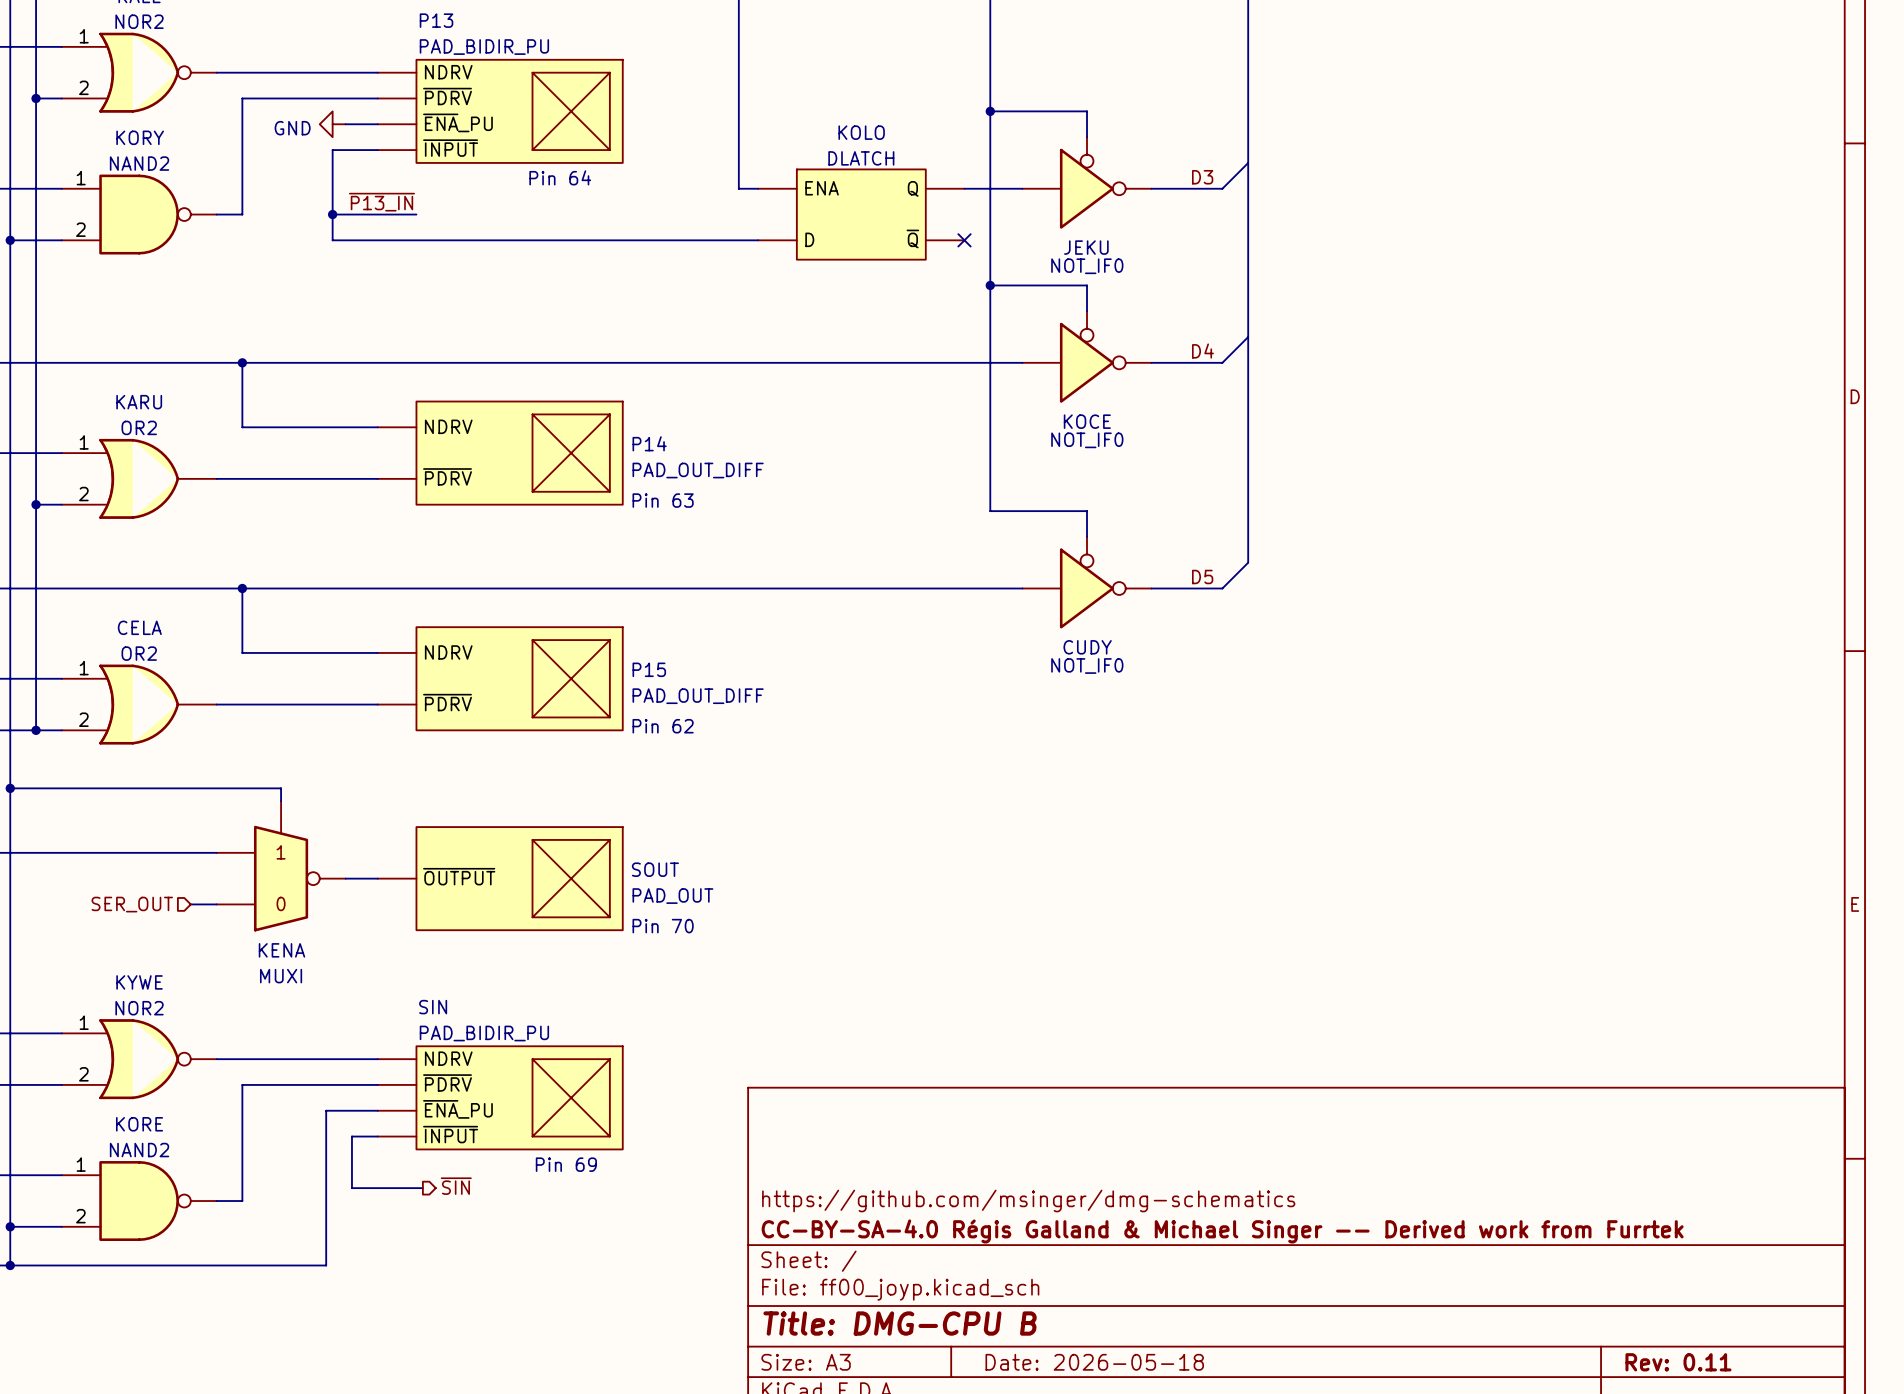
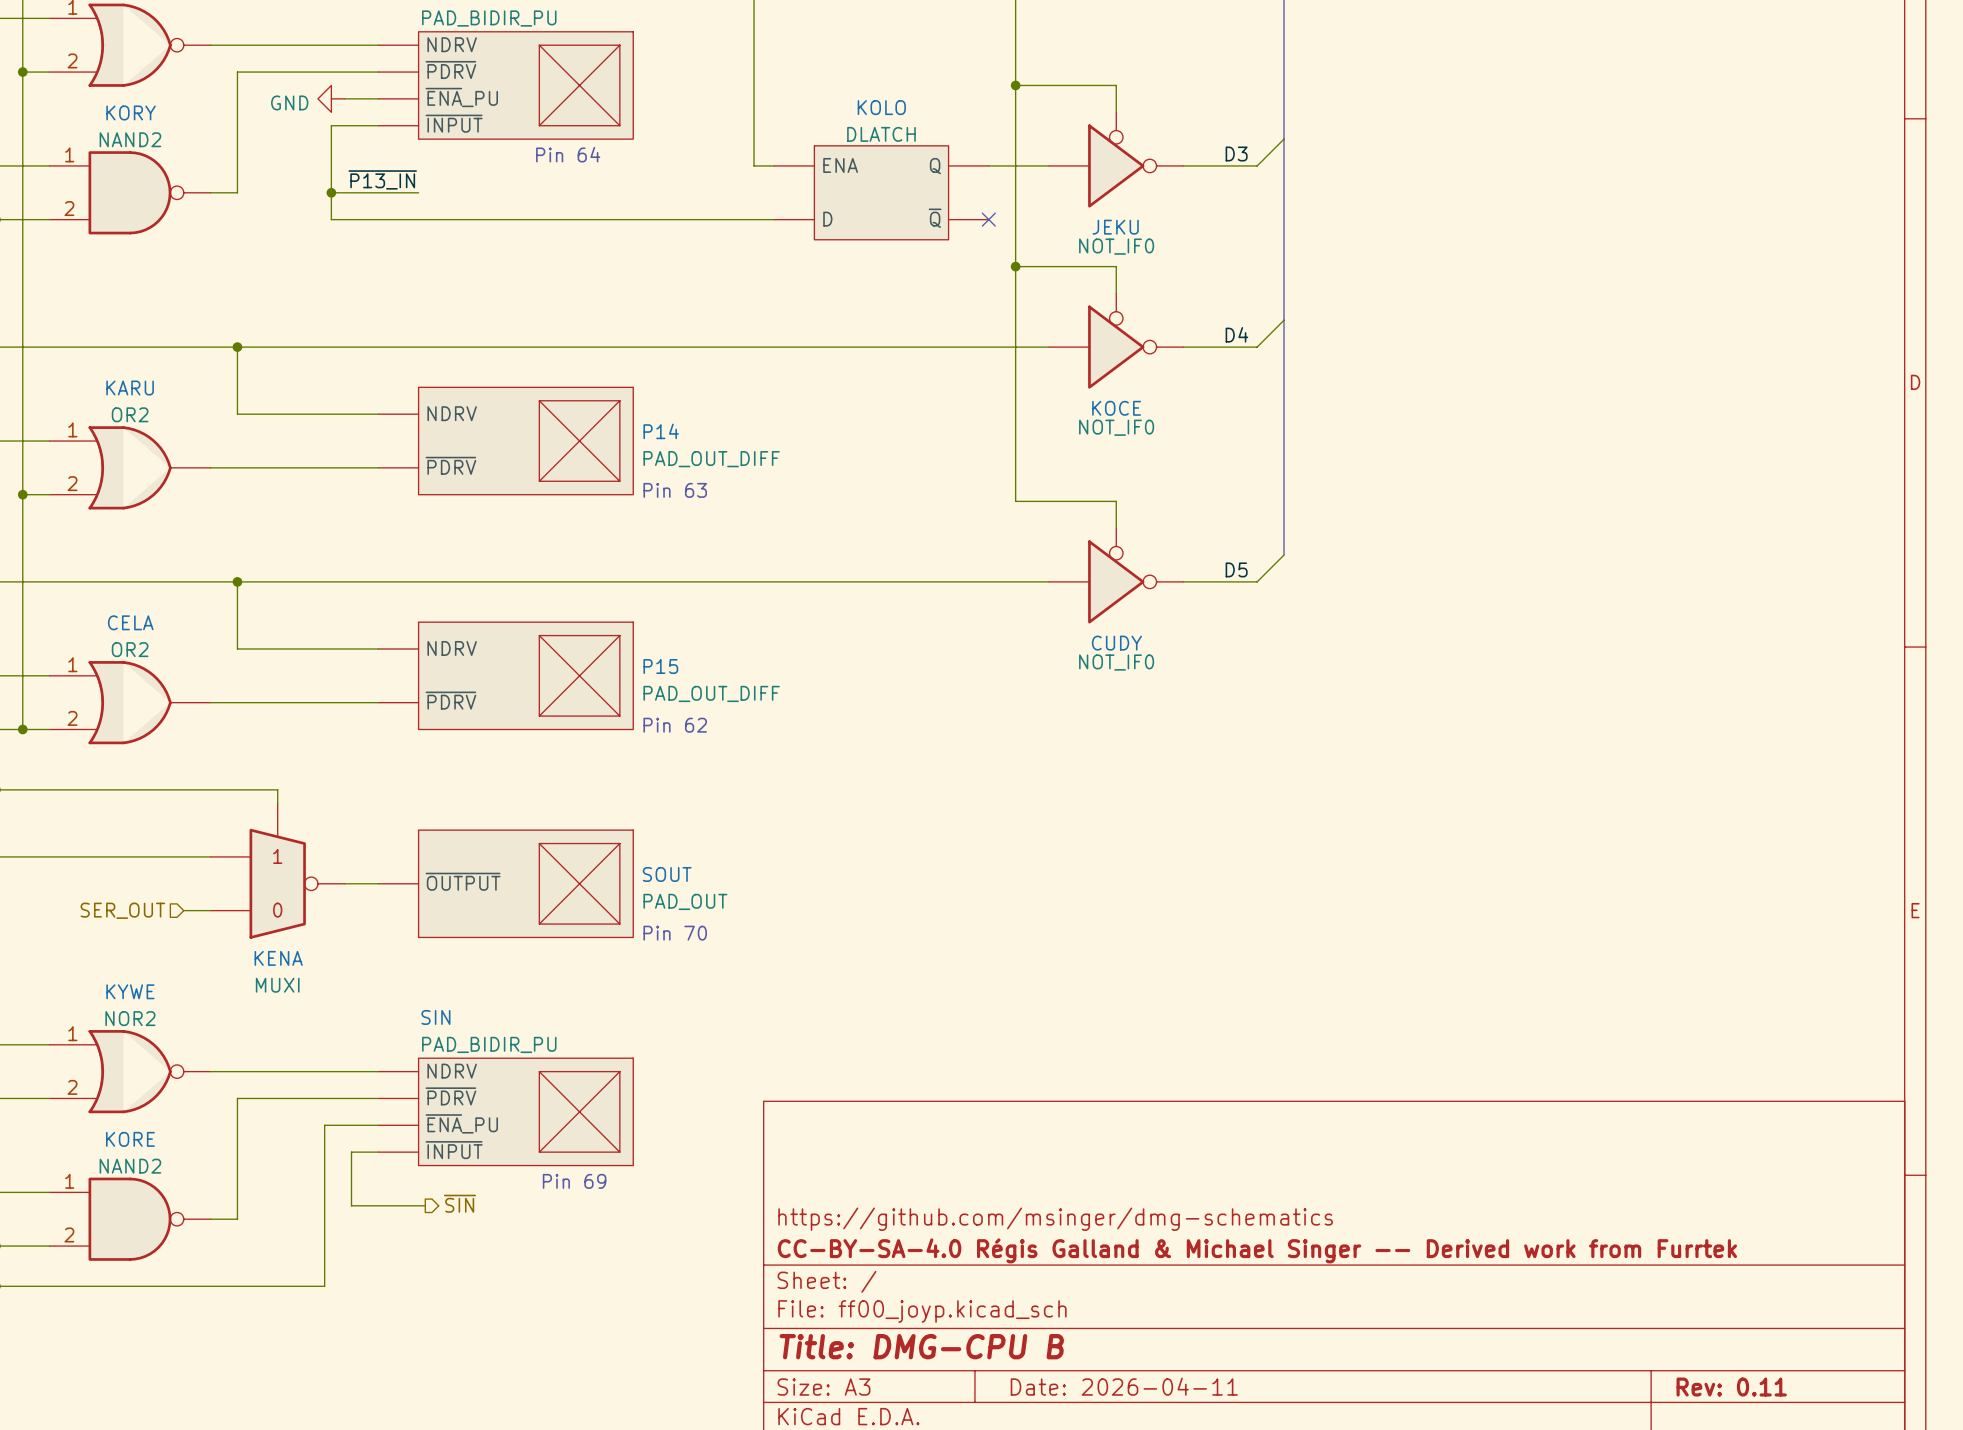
title block: Date: 2026-05-18 (1094, 1362) -> Date: 2026-04-11 (1124, 1386)

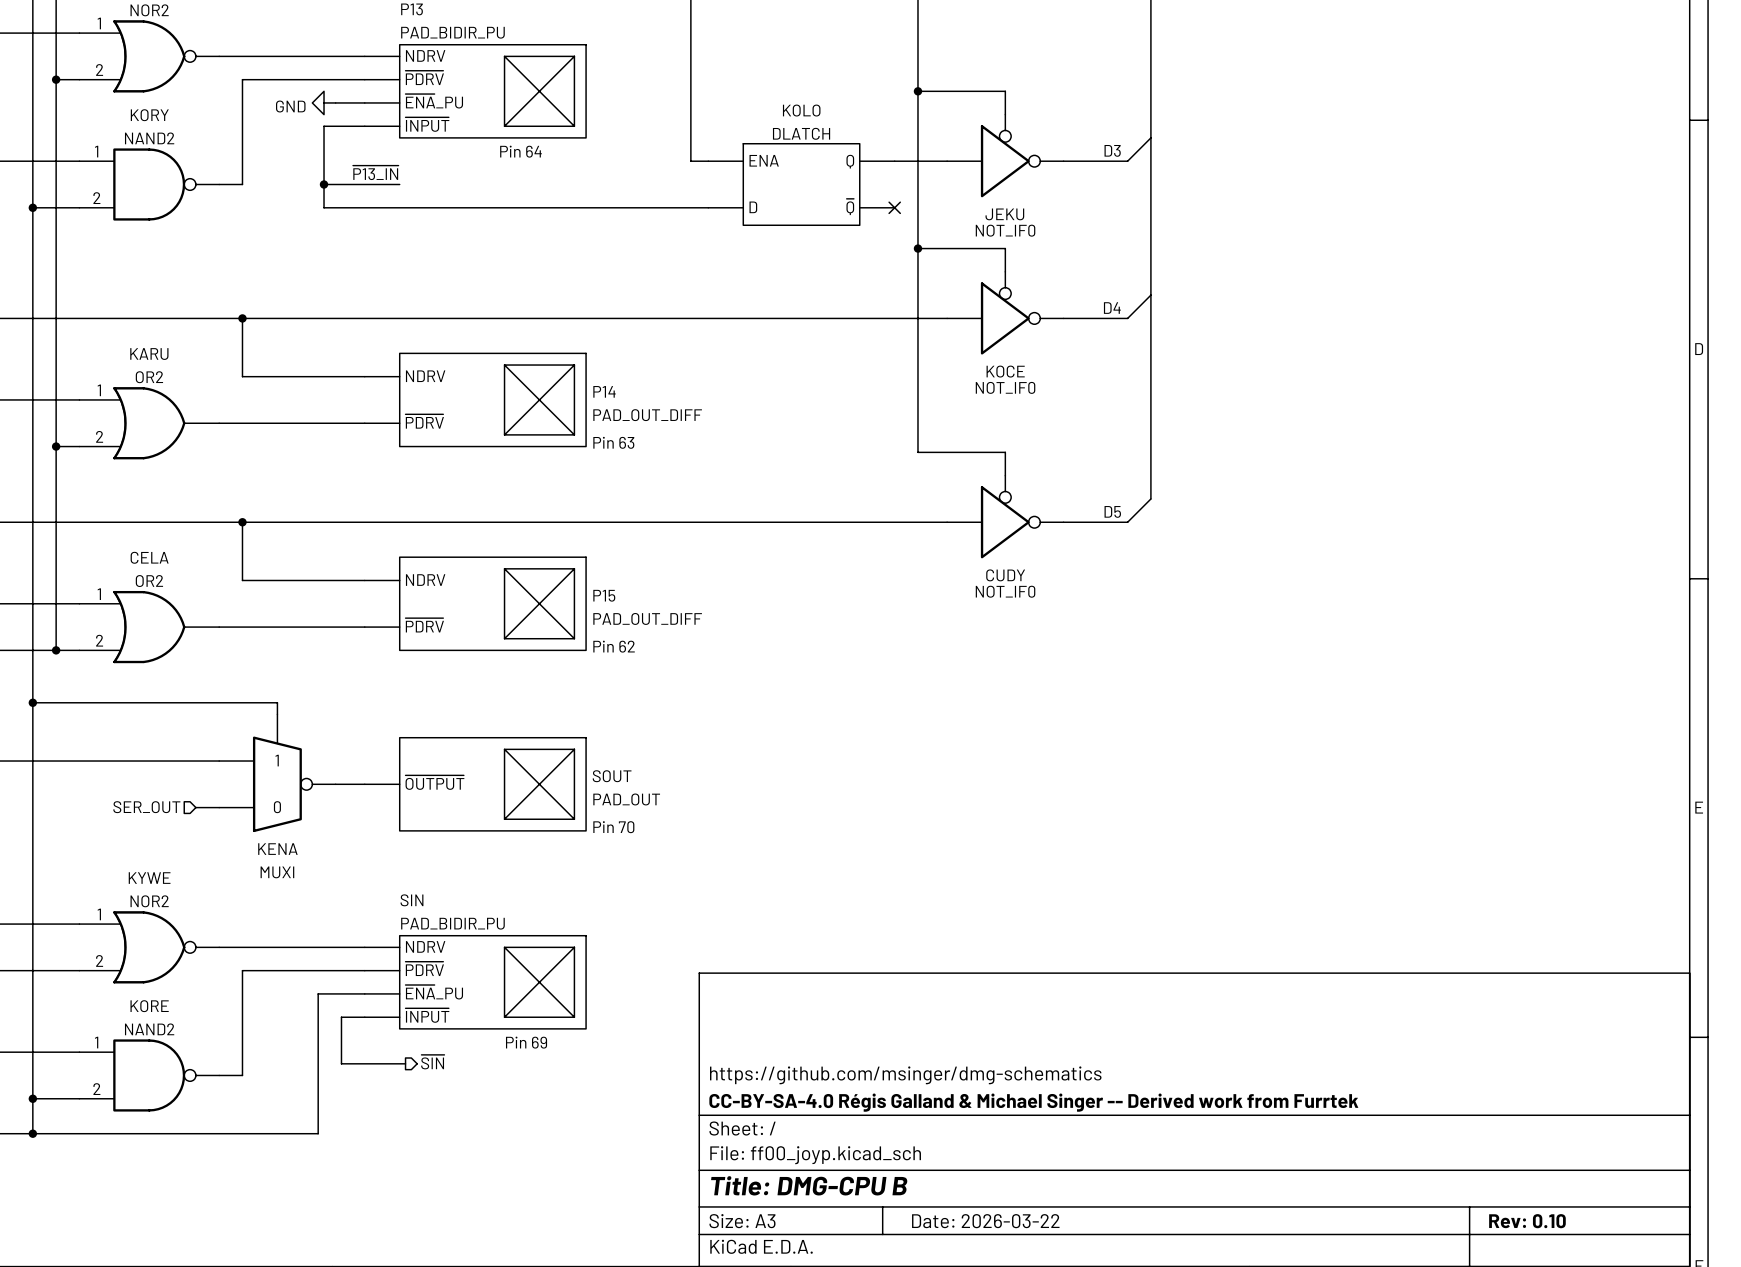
title block: Date: 2026-04-11 (1124, 1386) -> Date: 2026-03-22 (985, 1221)
title block: Rev: 0.11 (1731, 1387) -> Rev: 0.10 (1527, 1221)

